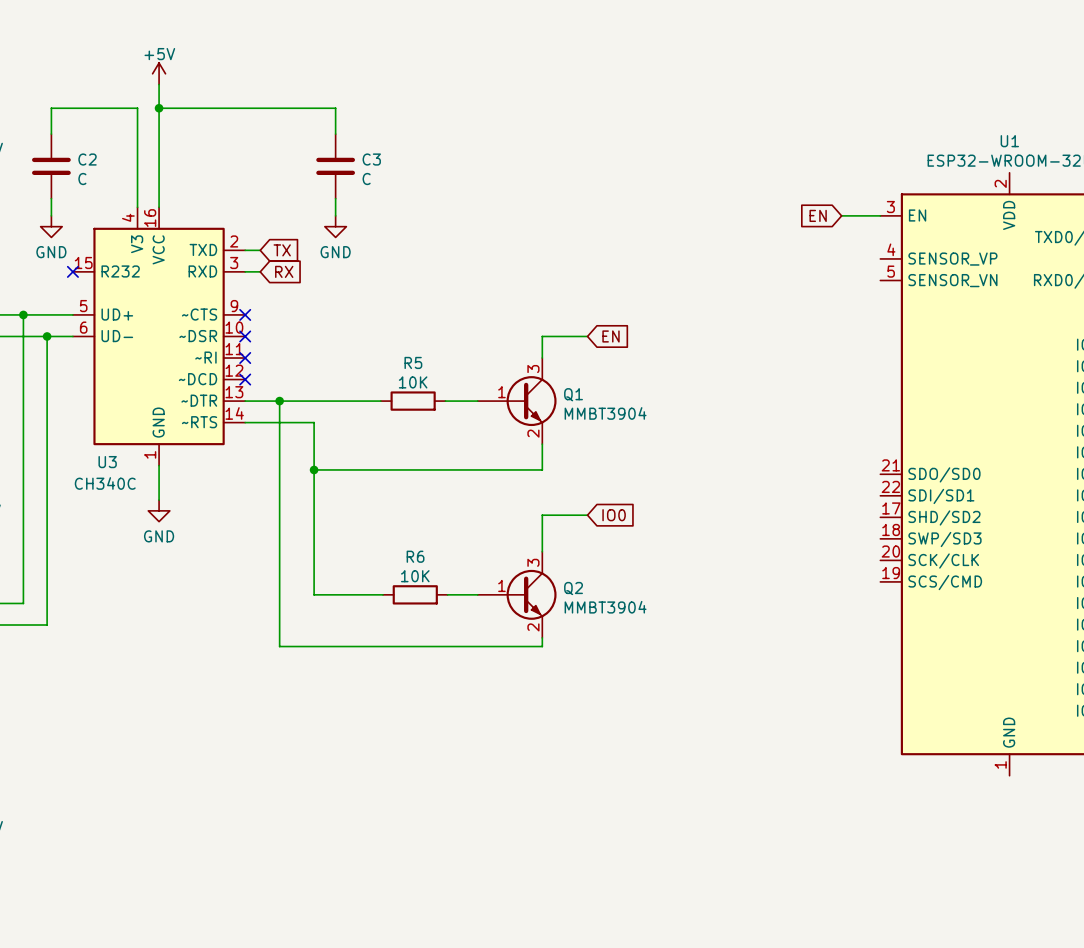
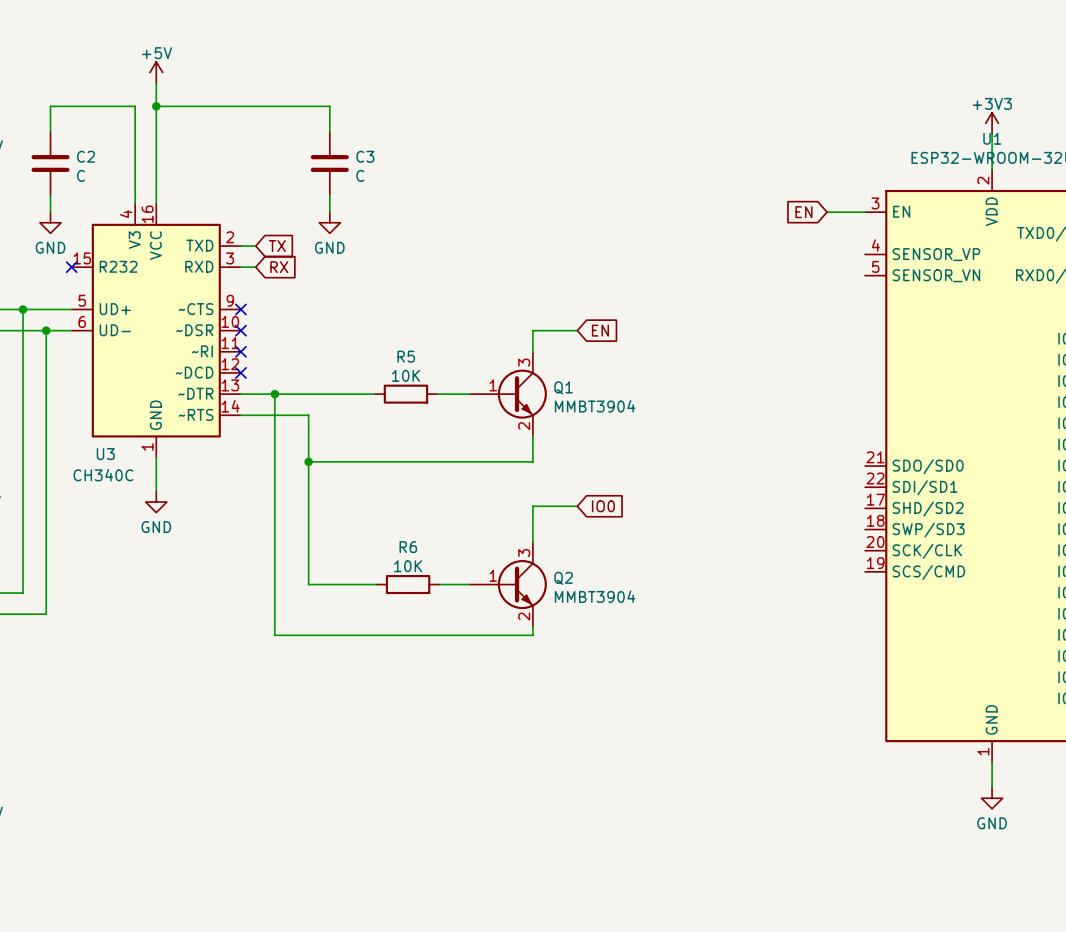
power symbol: none -> +3V3 (992, 123)
wire: none -> (992, 133) (992, 169)
wire: none -> (992, 762) (992, 787)
power symbol: none -> GND (992, 798)

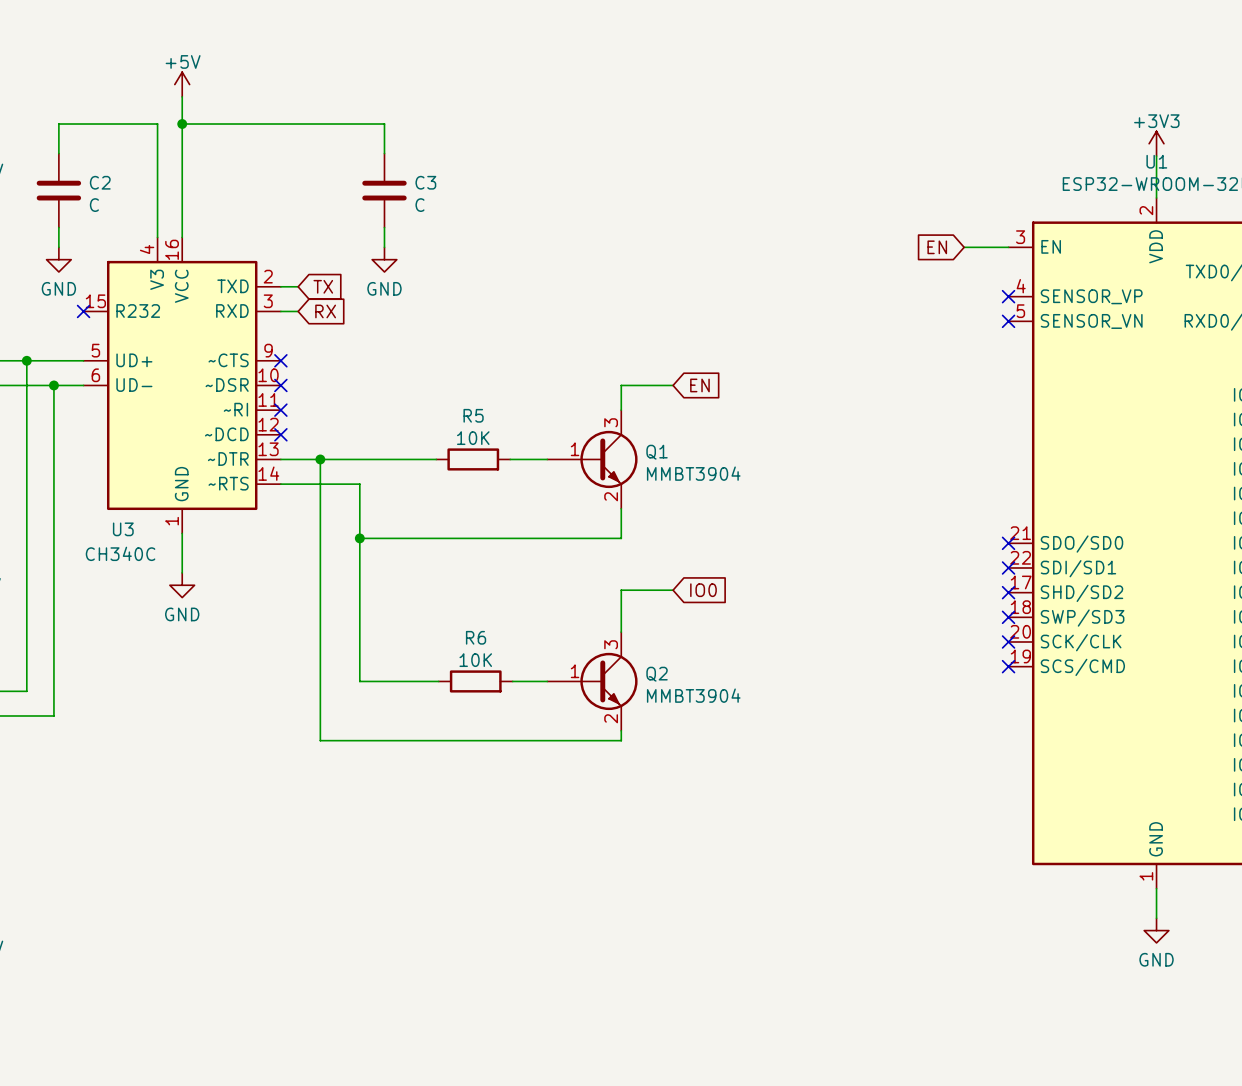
no-connect mark: none -> (1008, 296)
no-connect mark: none -> (1008, 321)
no-connect mark: none -> (1008, 543)
no-connect mark: none -> (1008, 567)
no-connect mark: none -> (1008, 592)
no-connect mark: none -> (1008, 617)
no-connect mark: none -> (1008, 641)
no-connect mark: none -> (1008, 666)

